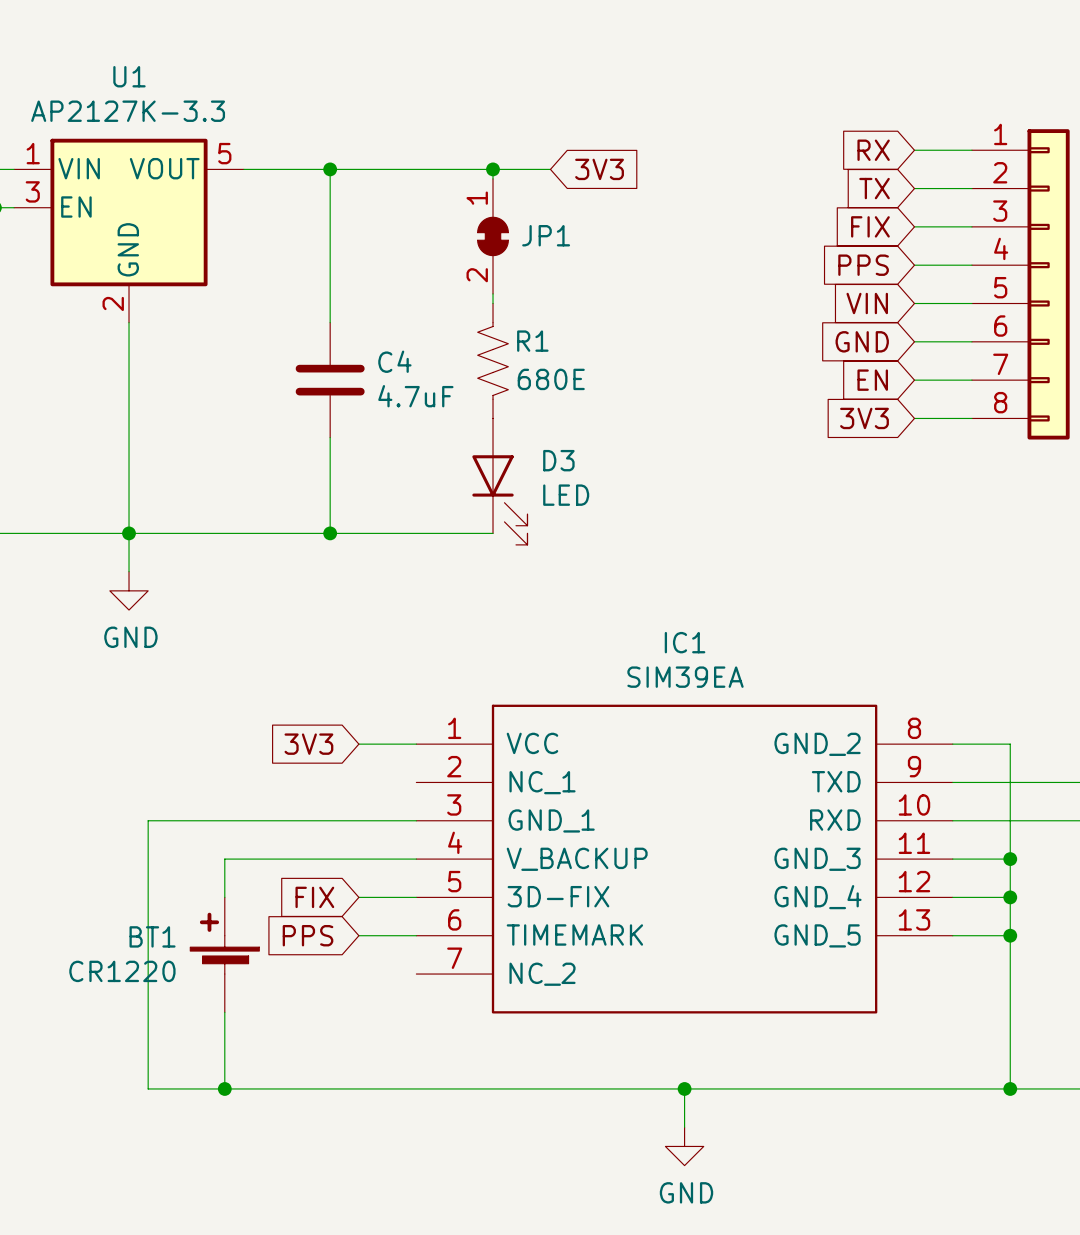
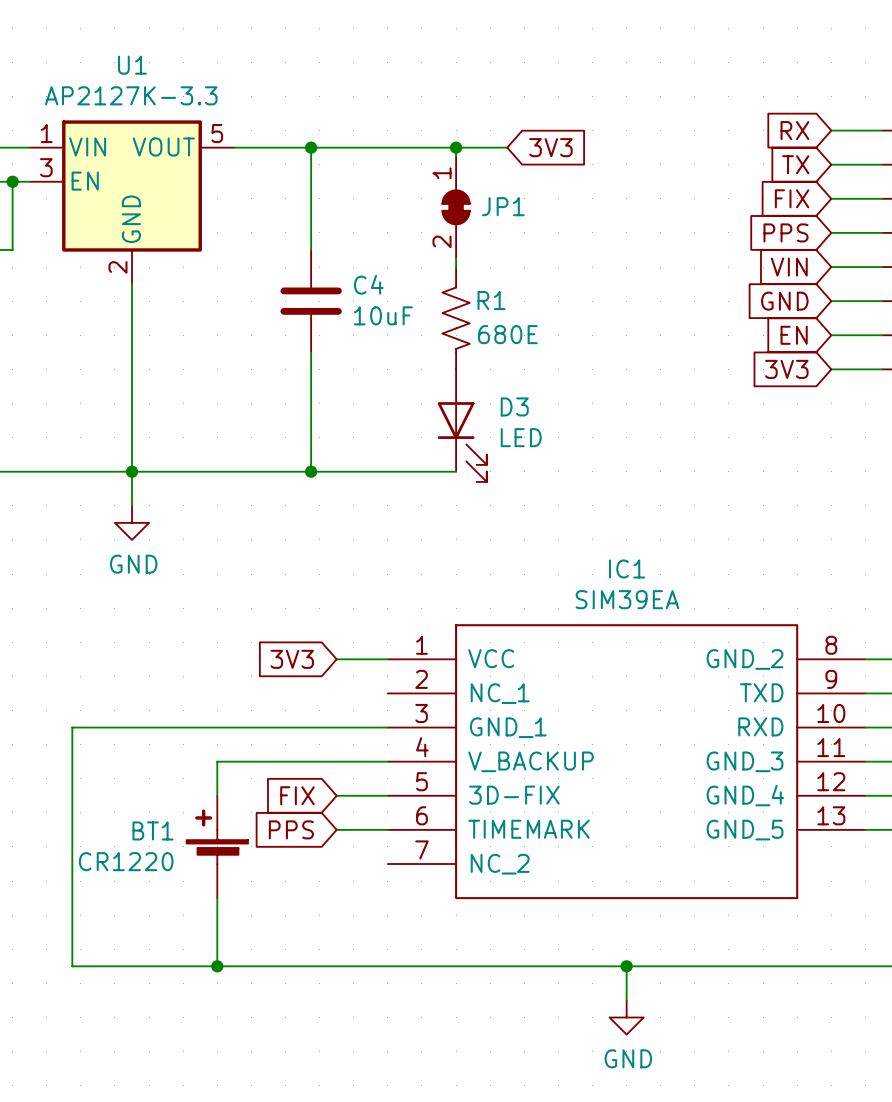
C4 position: (330, 380) -> (311, 301)
C4 value: 4.7uF (415, 396) -> 10uF (383, 315)
wire: (148, 820) (148, 1088) -> (149, 727) (72, 727) (72, 966) (149, 966)

